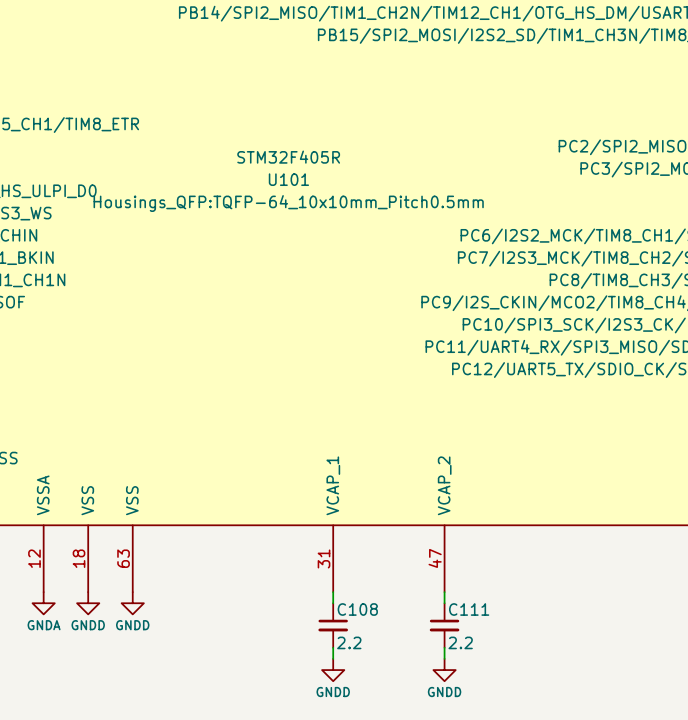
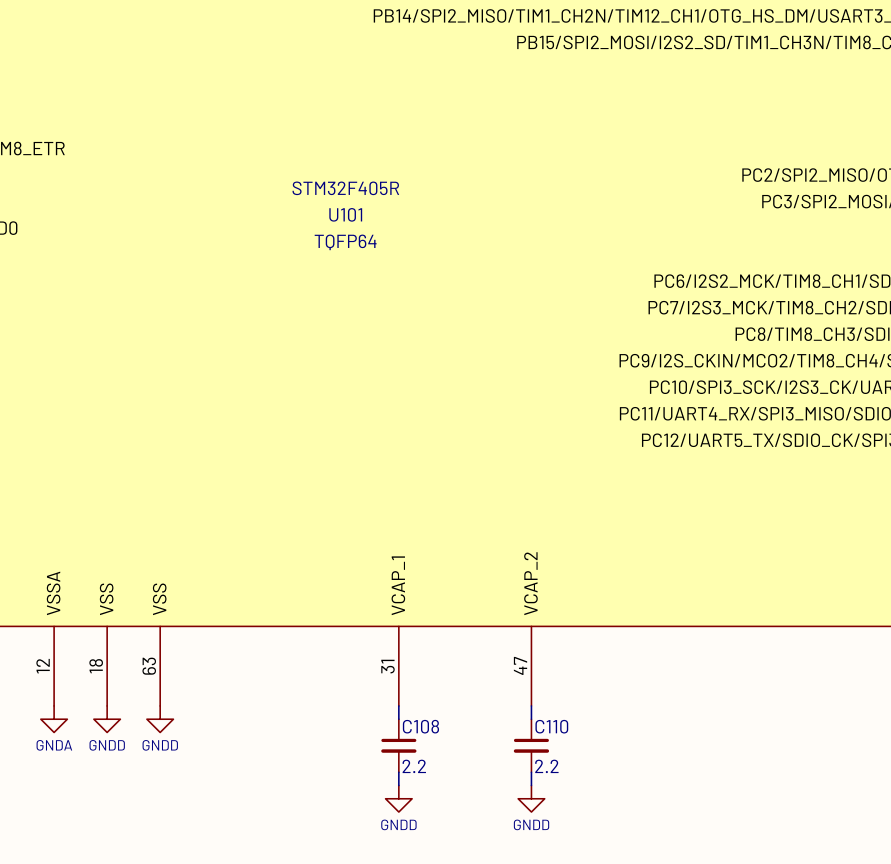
U101 text: Housings_QFP:TQFP-64_10x10mm_Pitch0.5mm (288, 203) -> TQFP64 (345, 242)
C111 name: C111 (469, 609) -> C110 (551, 726)

